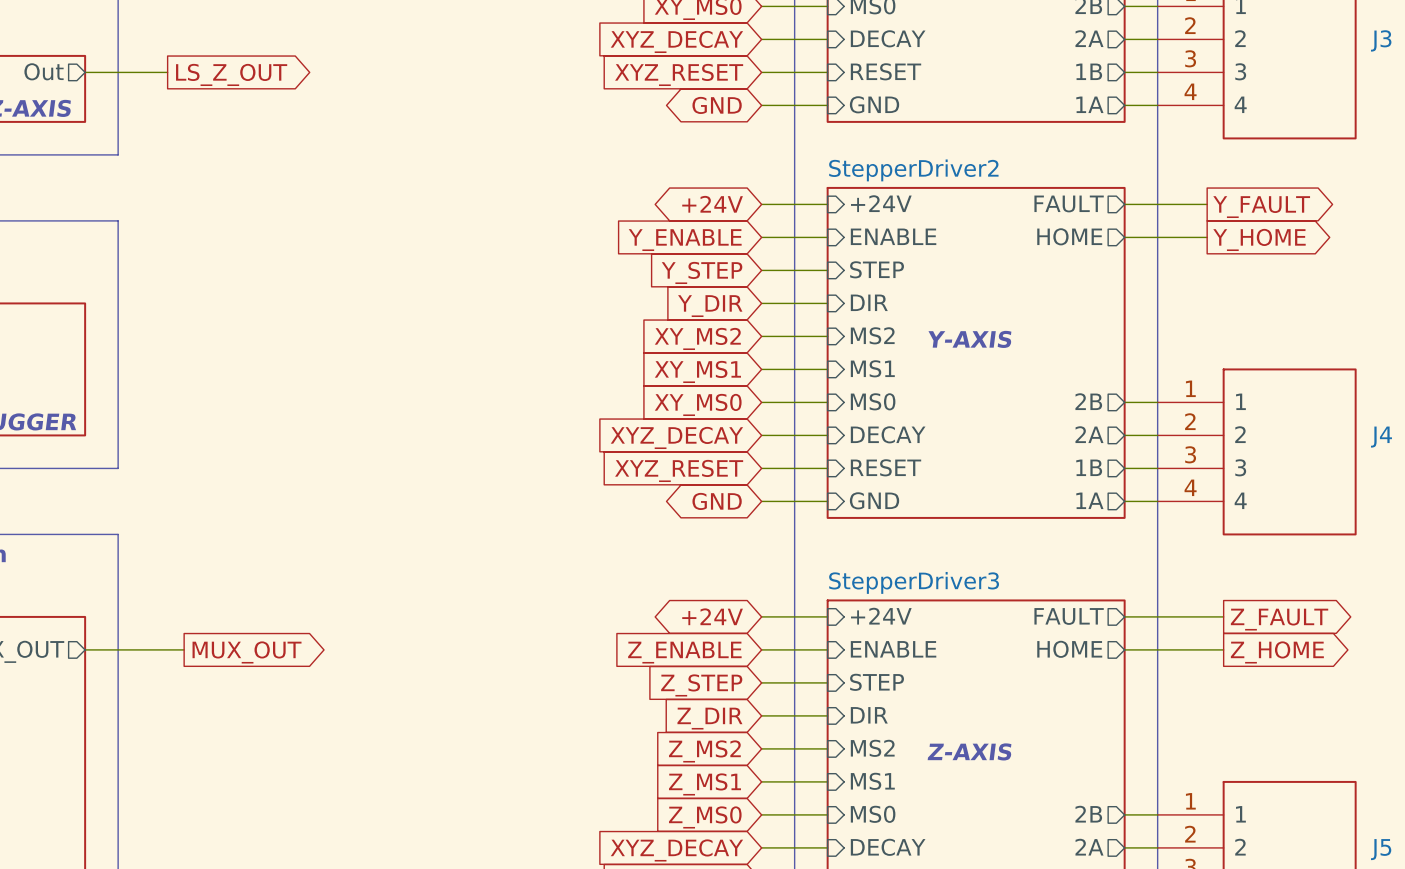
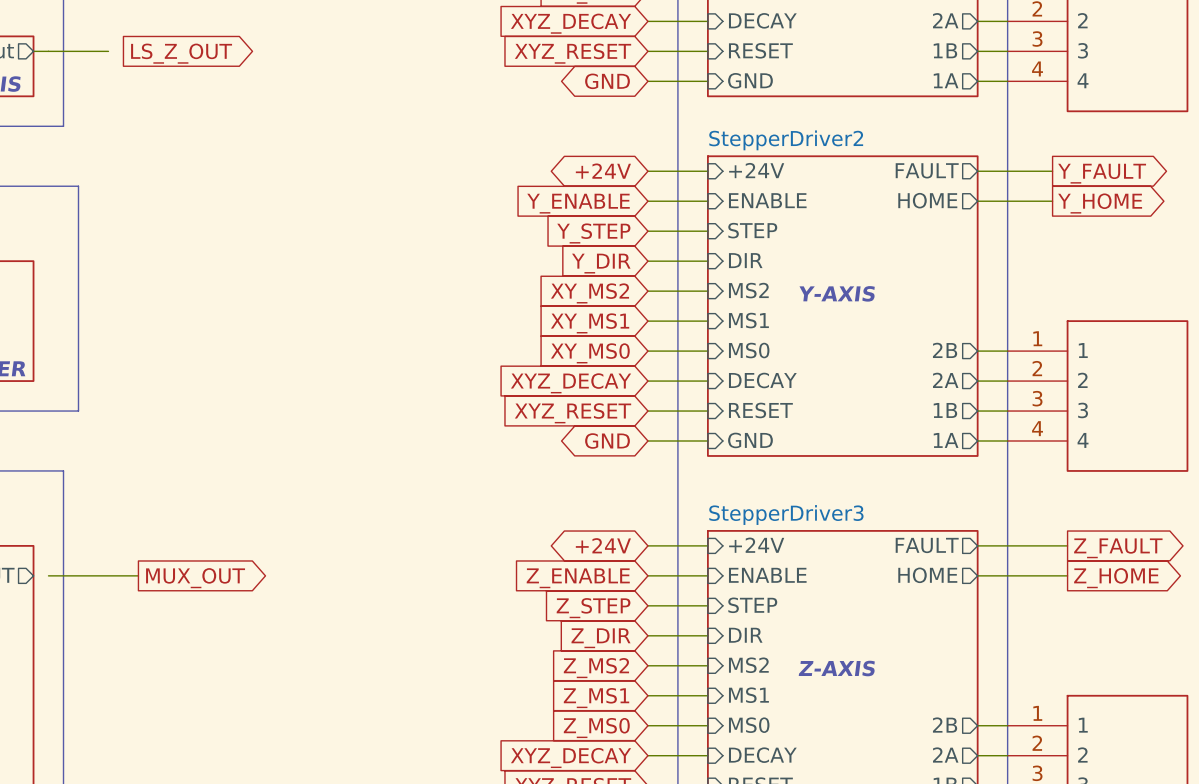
global label position: LS_Z_OUT (231, 74) -> LS_Z_OUT (181, 53)
line: (118, 220) (118, 468) -> (63, 186) (78, 186) (78, 411) (63, 411)
wire: (85, 649) (101, 649) -> (123, 575) (138, 575)
global label position: MUX_OUT (247, 652) -> MUX_OUT (195, 578)

